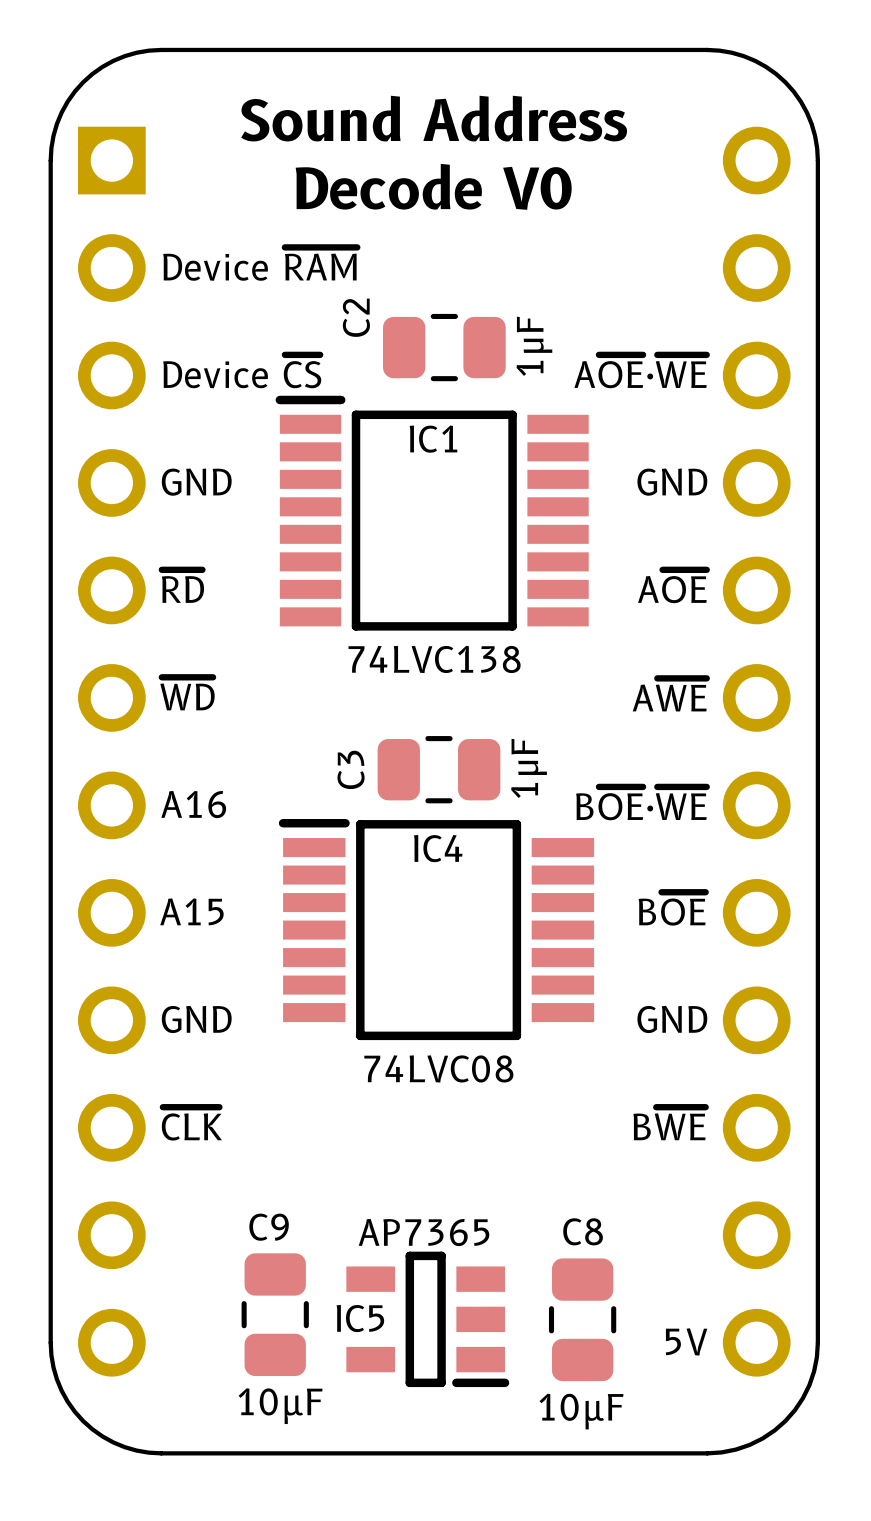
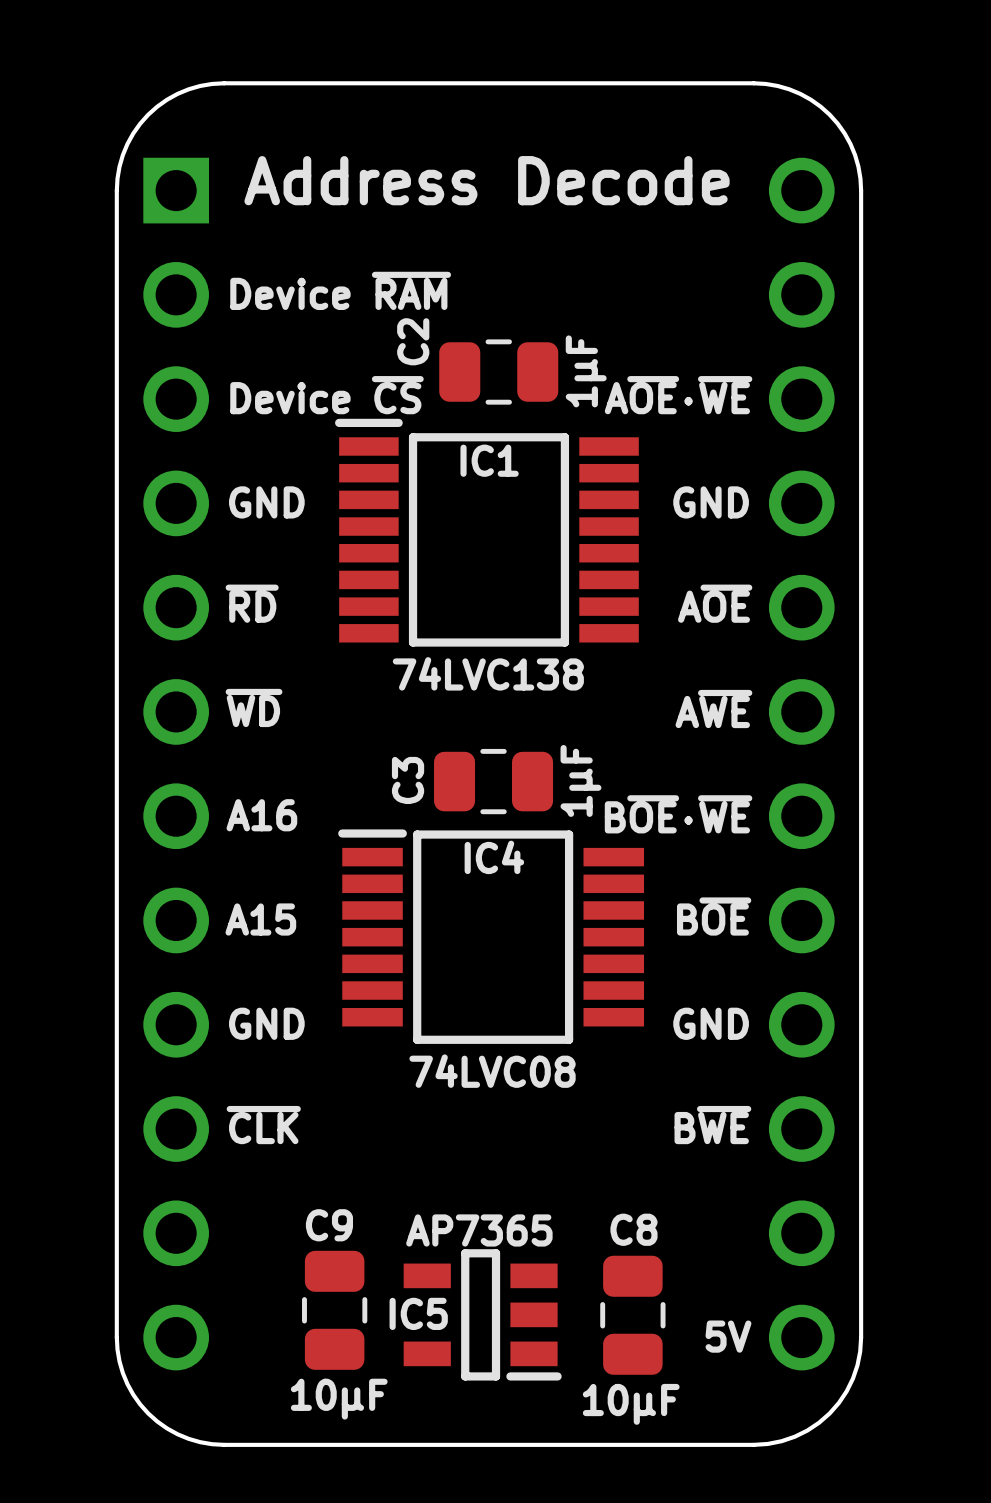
text: Sound Address (434, 118) -> none
text: none -> Address Decode (487, 180)
text: Decode V0 (433, 186) -> none

